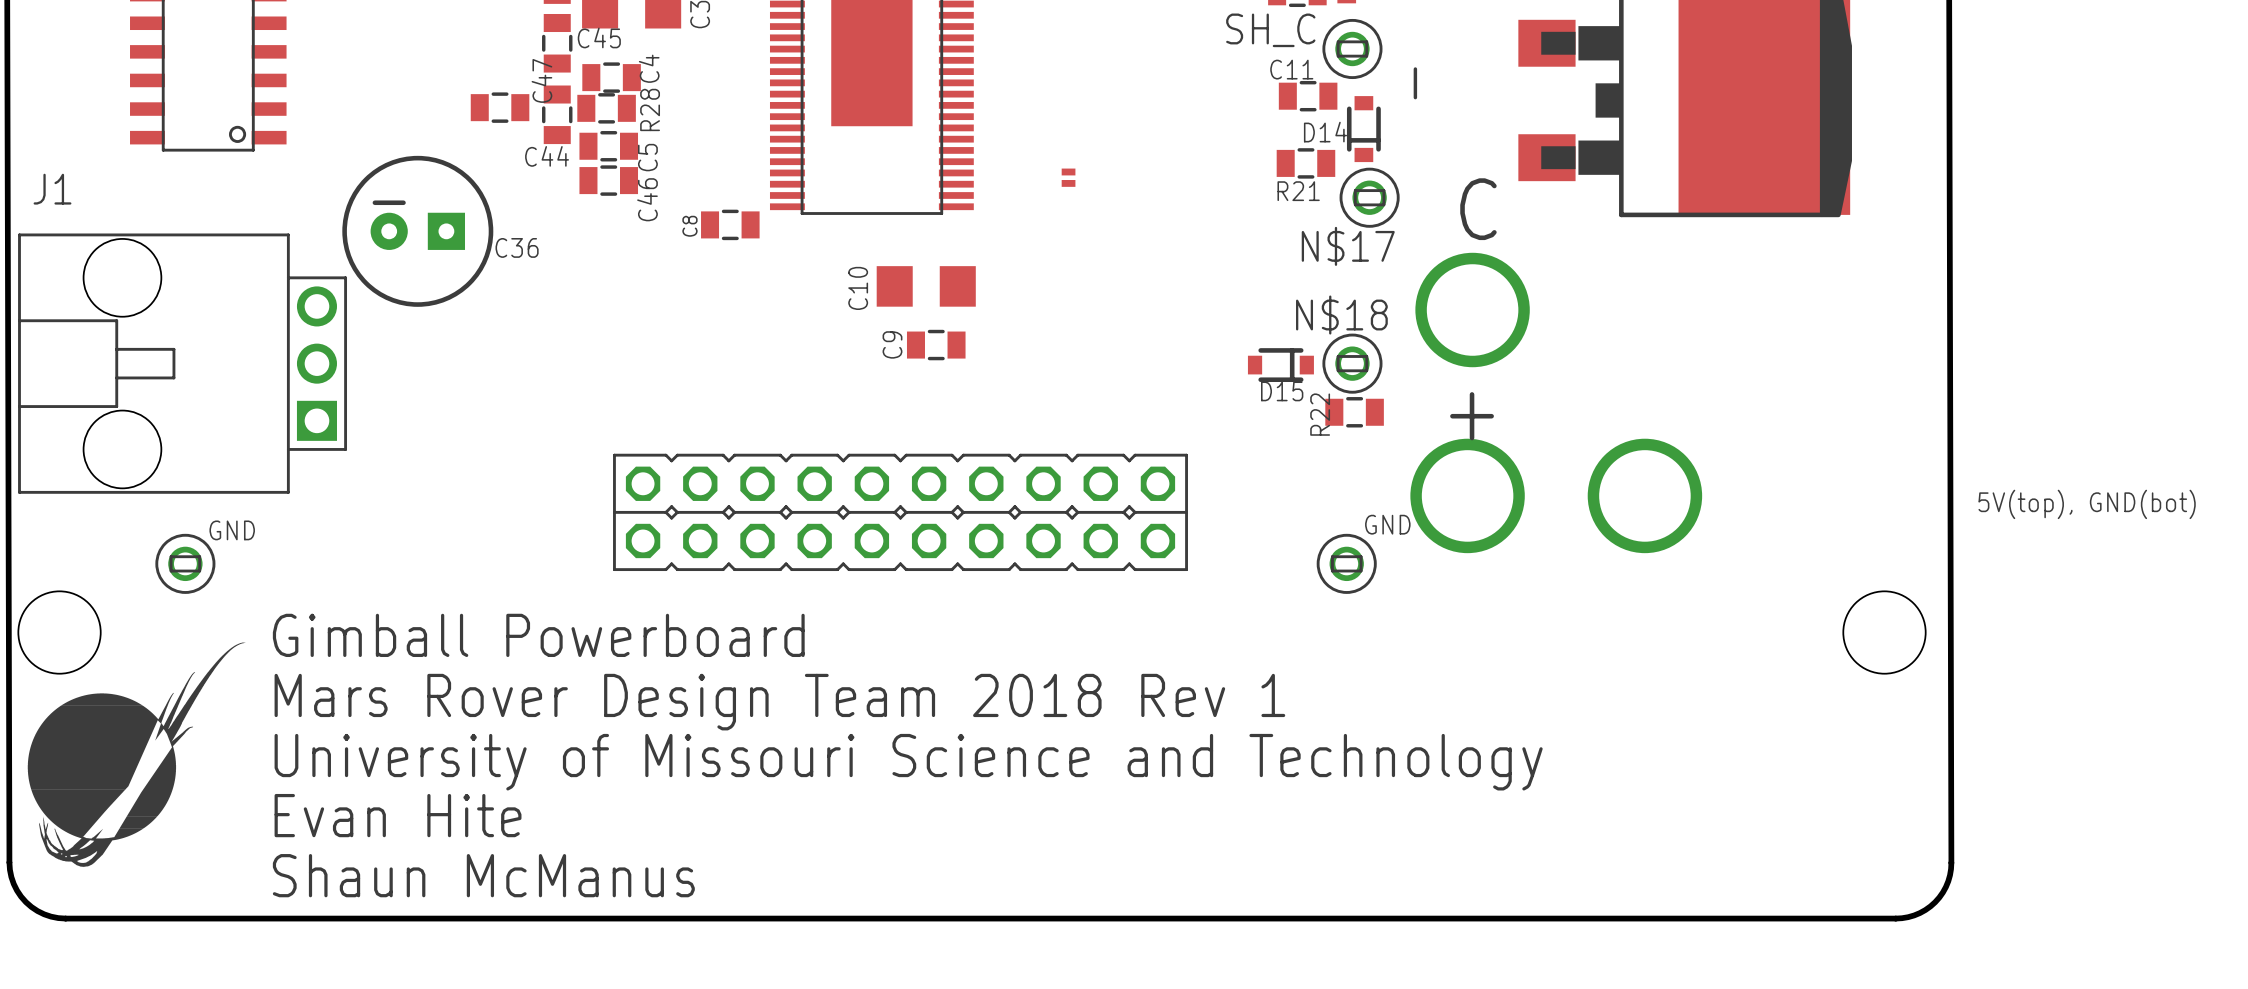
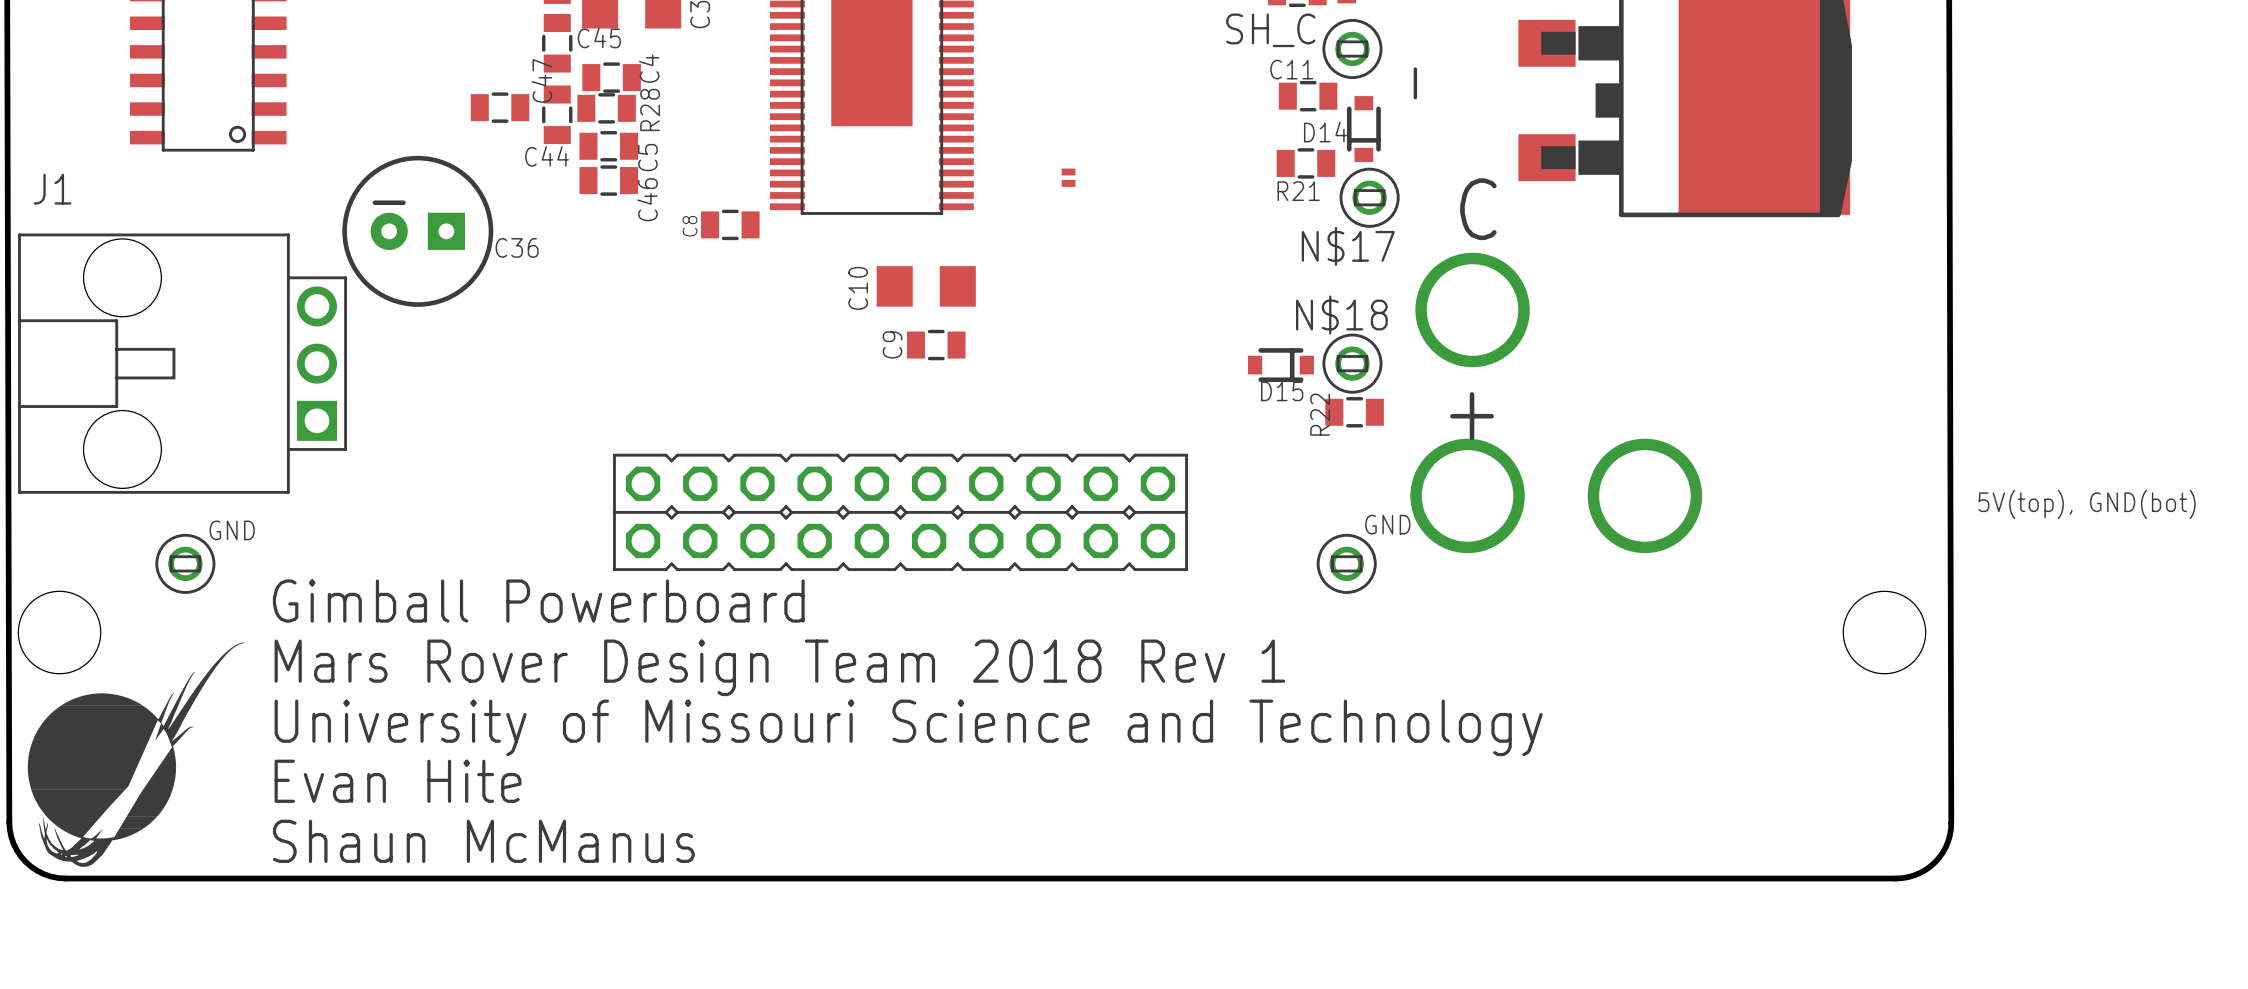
text position: Gimball Powerboard (538, 635) -> Gimball Powerboard (538, 601)
text position: Mars Rover Design Team 2018 Rev 1 (779, 702) -> Mars Rover Design Team 2018 Rev 1 (779, 667)
text position: University of Missouri Science and Technology (908, 762) -> University of Missouri Science and Technology (908, 727)
text position: Evan Hite (398, 815) -> Evan Hite (398, 781)
board edge: (9, 822) (9, 869) (17, 890) (25, 902) (37, 911) (51, 916) (65, 918) (1895, 918) (1908, 917) (1925, 910) (1942, 892) (1951, 869) (1951, 822) -> (9, 822) (13, 843) (25, 862) (44, 874) (65, 878) (1895, 878) (1914, 875) (1935, 862) (1945, 847) (1951, 822)
text position: Shaun McManus (483, 875) -> Shaun McManus (483, 841)

